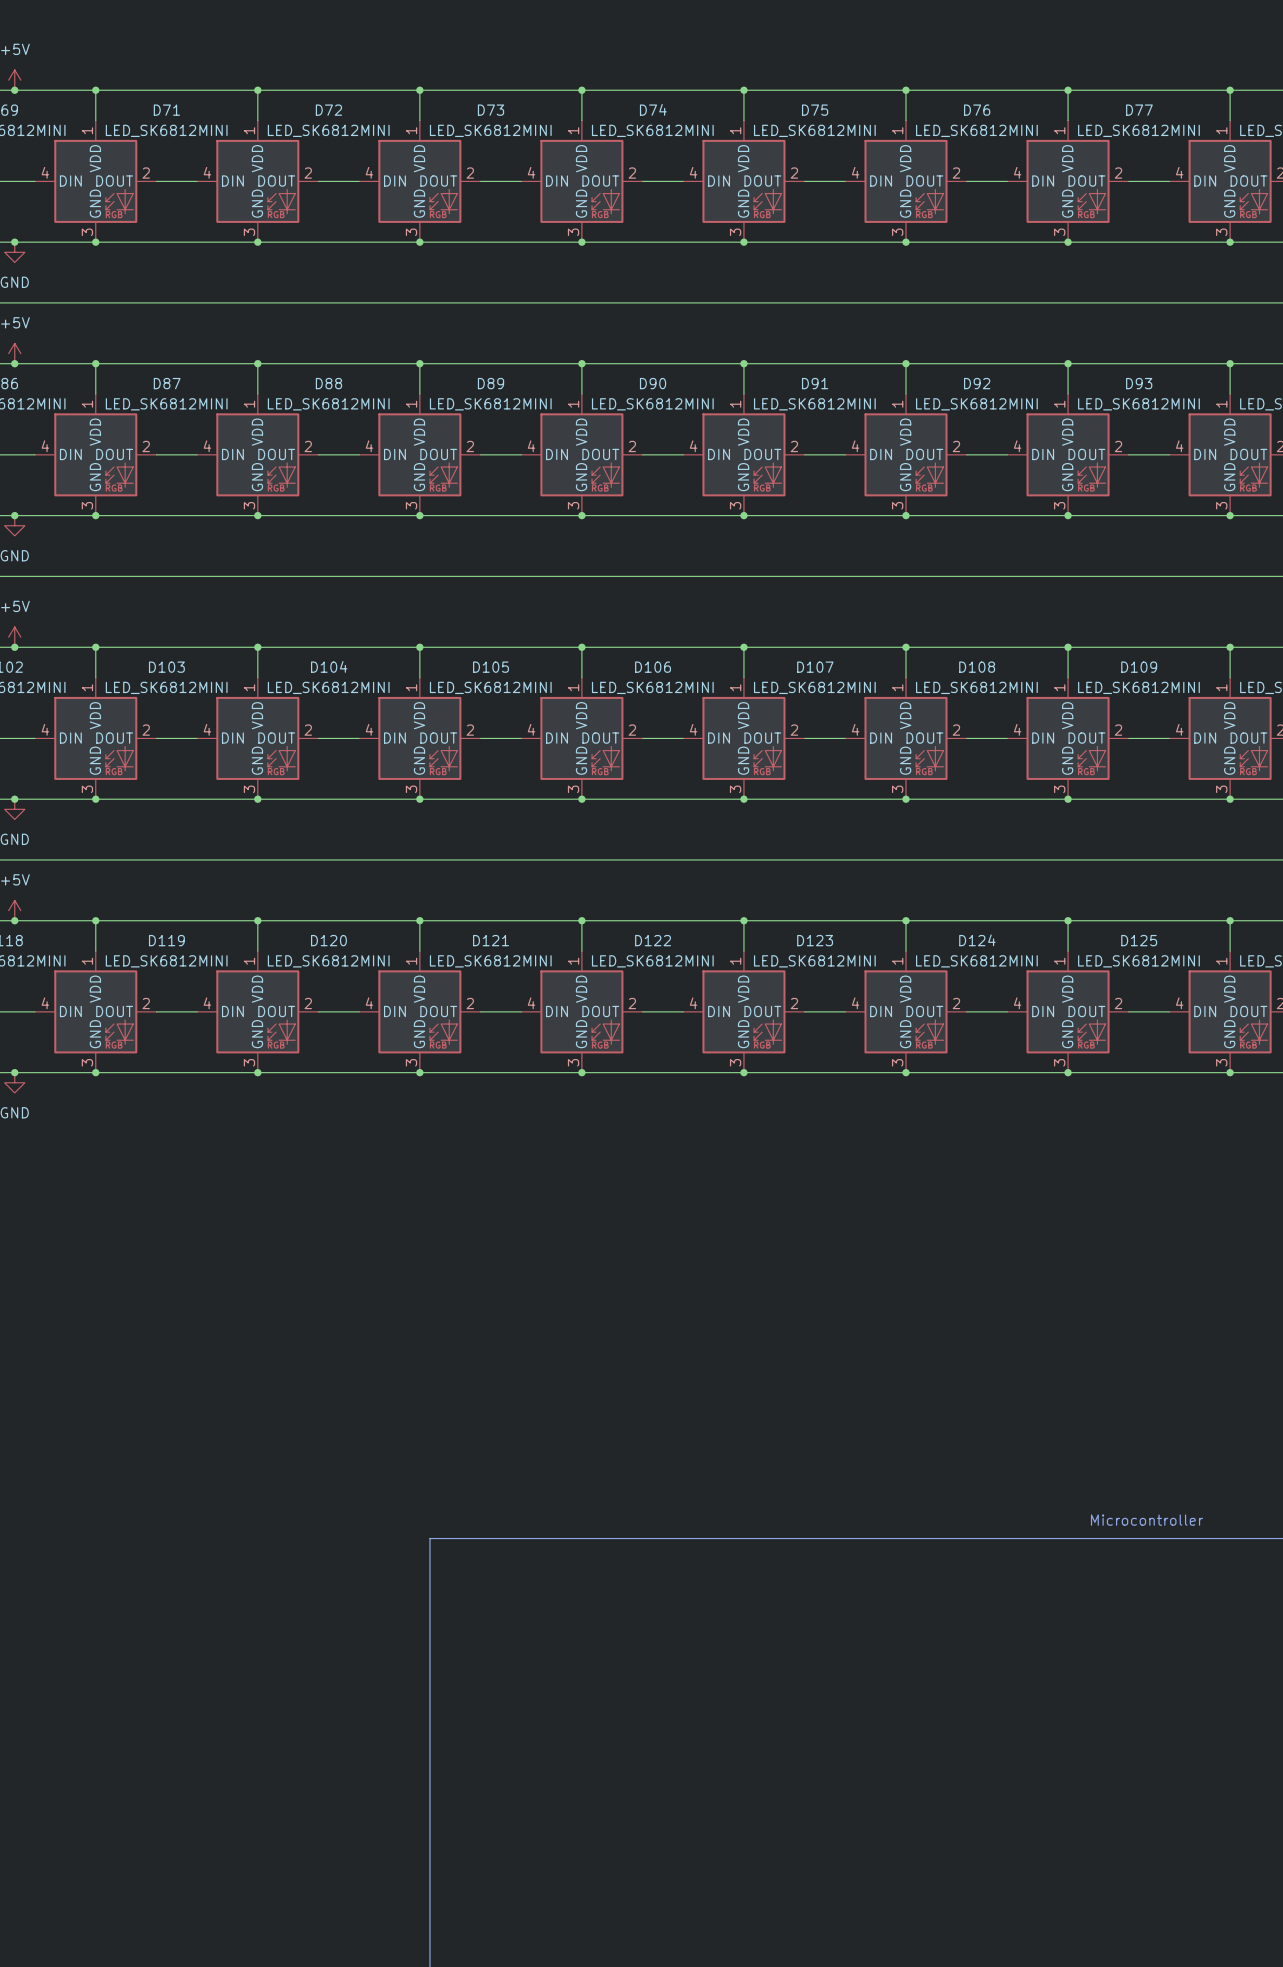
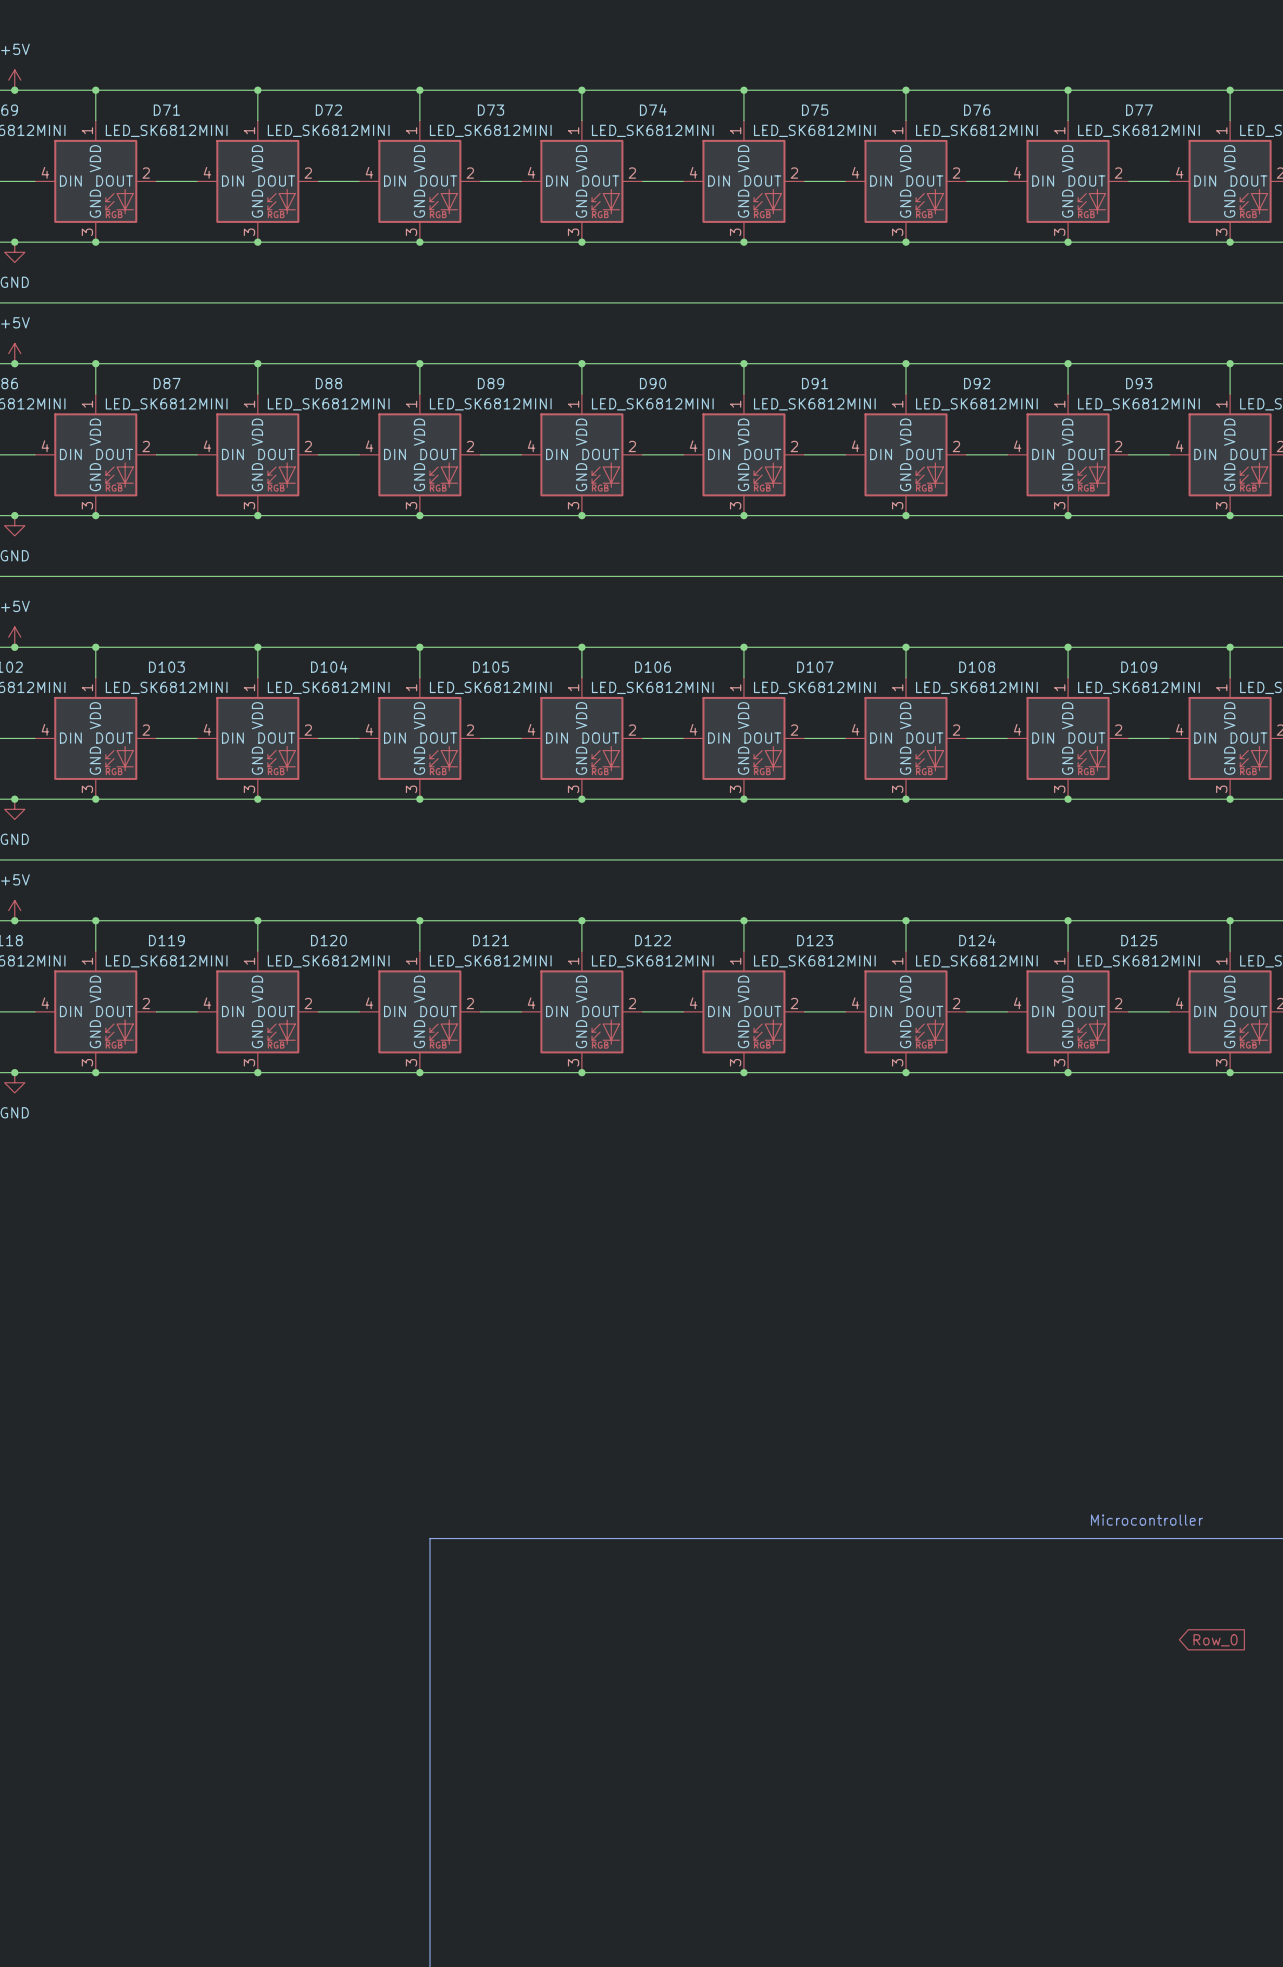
global label: none -> Row_0 (1215, 1640)

